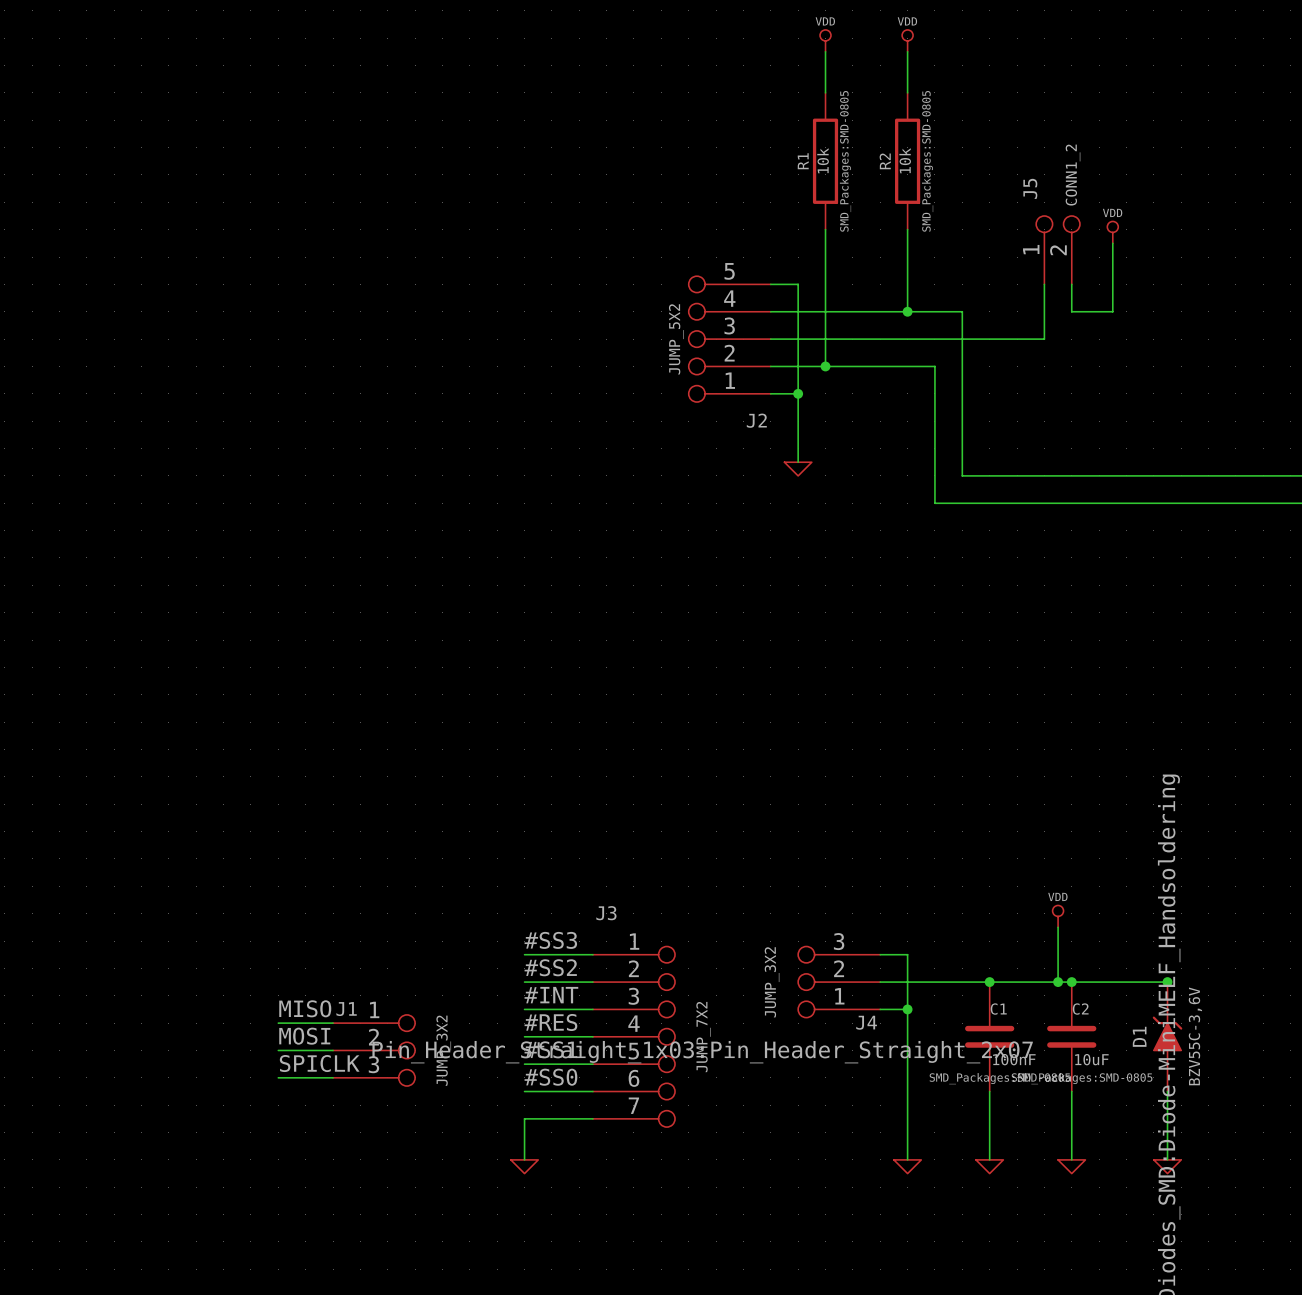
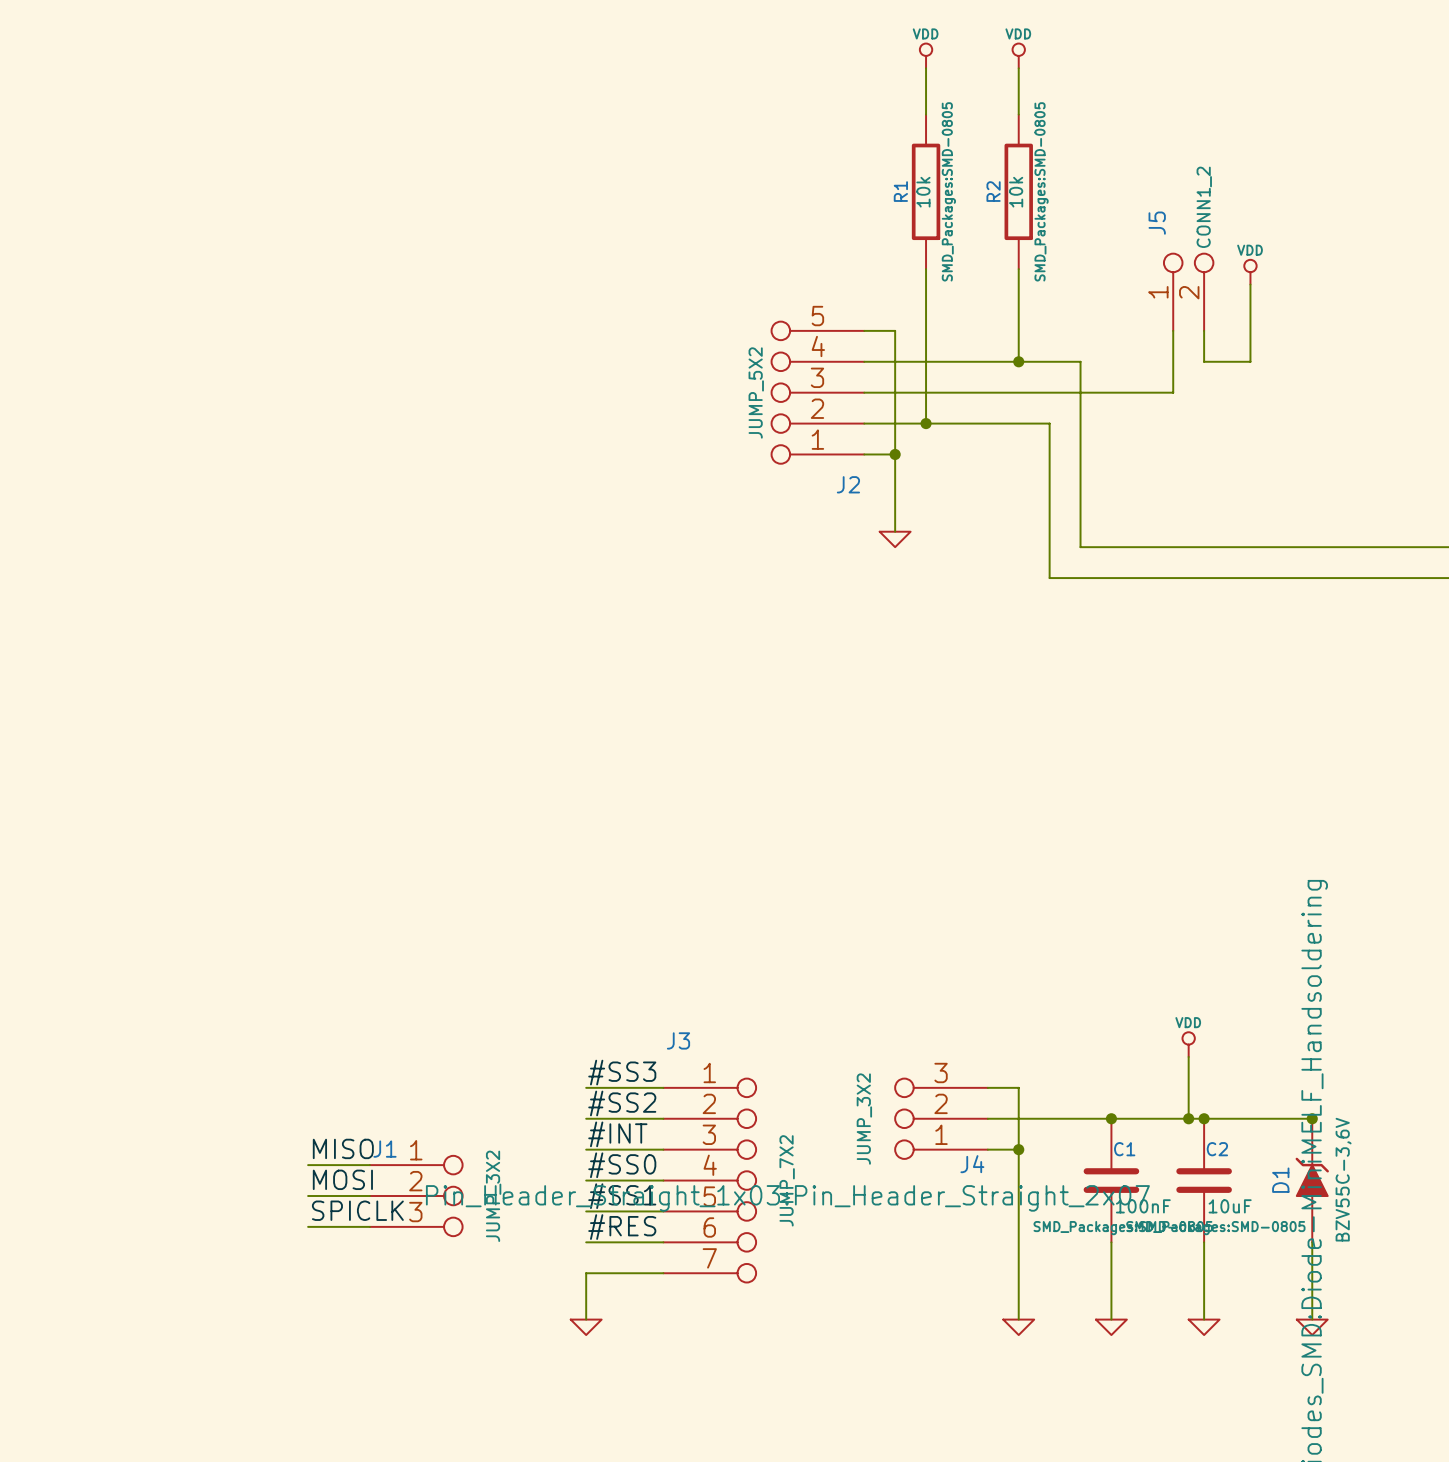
label: #RES (550, 1022) -> #SS0 (622, 1165)
label: #SS0 (550, 1077) -> #RES (622, 1227)

